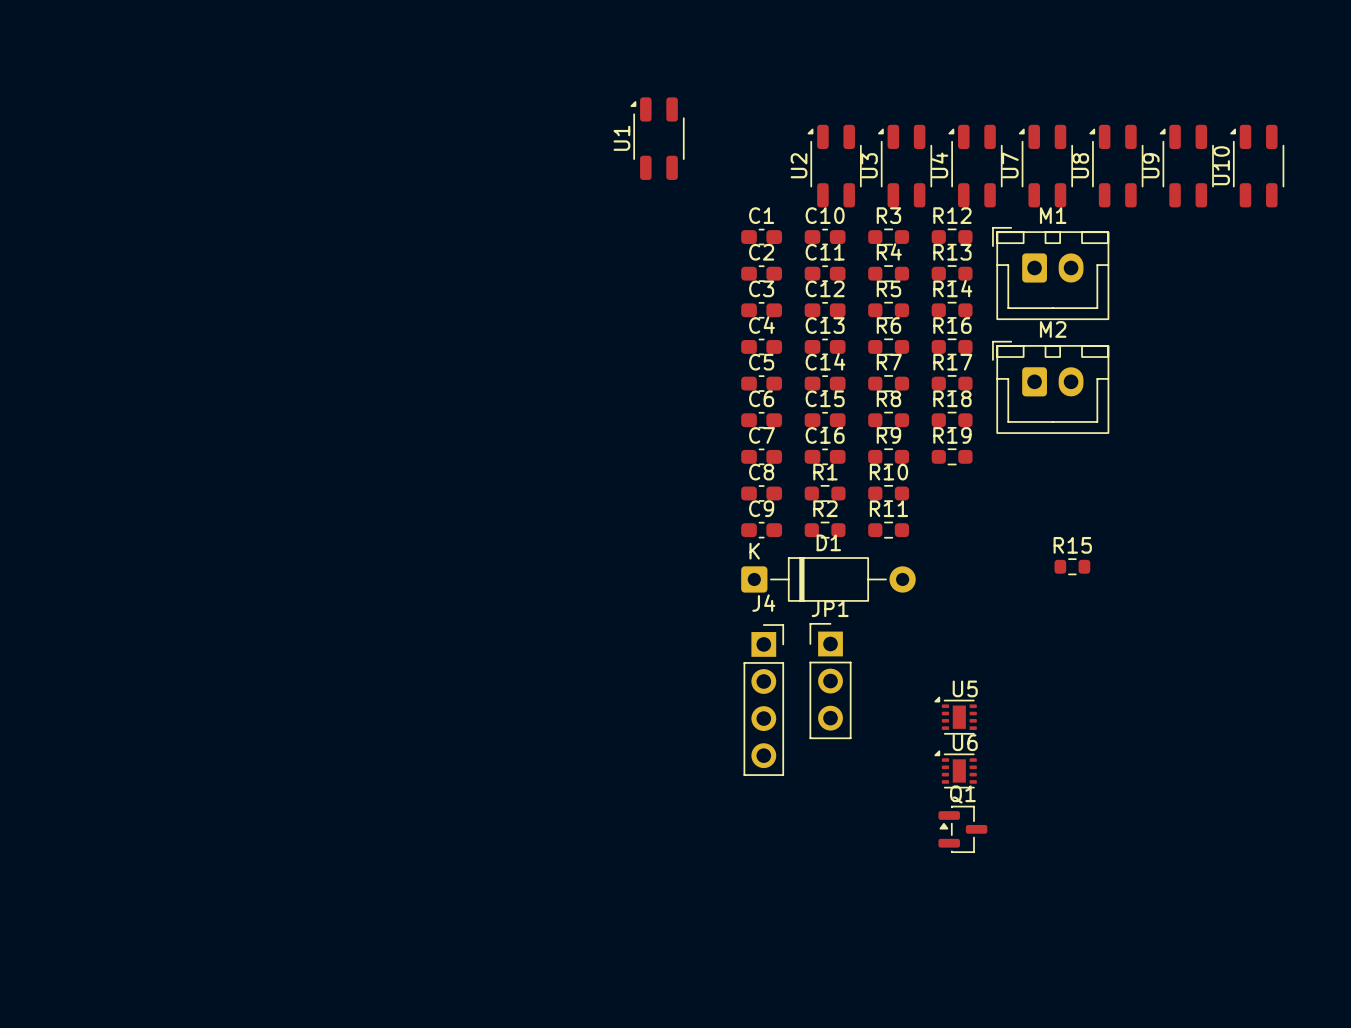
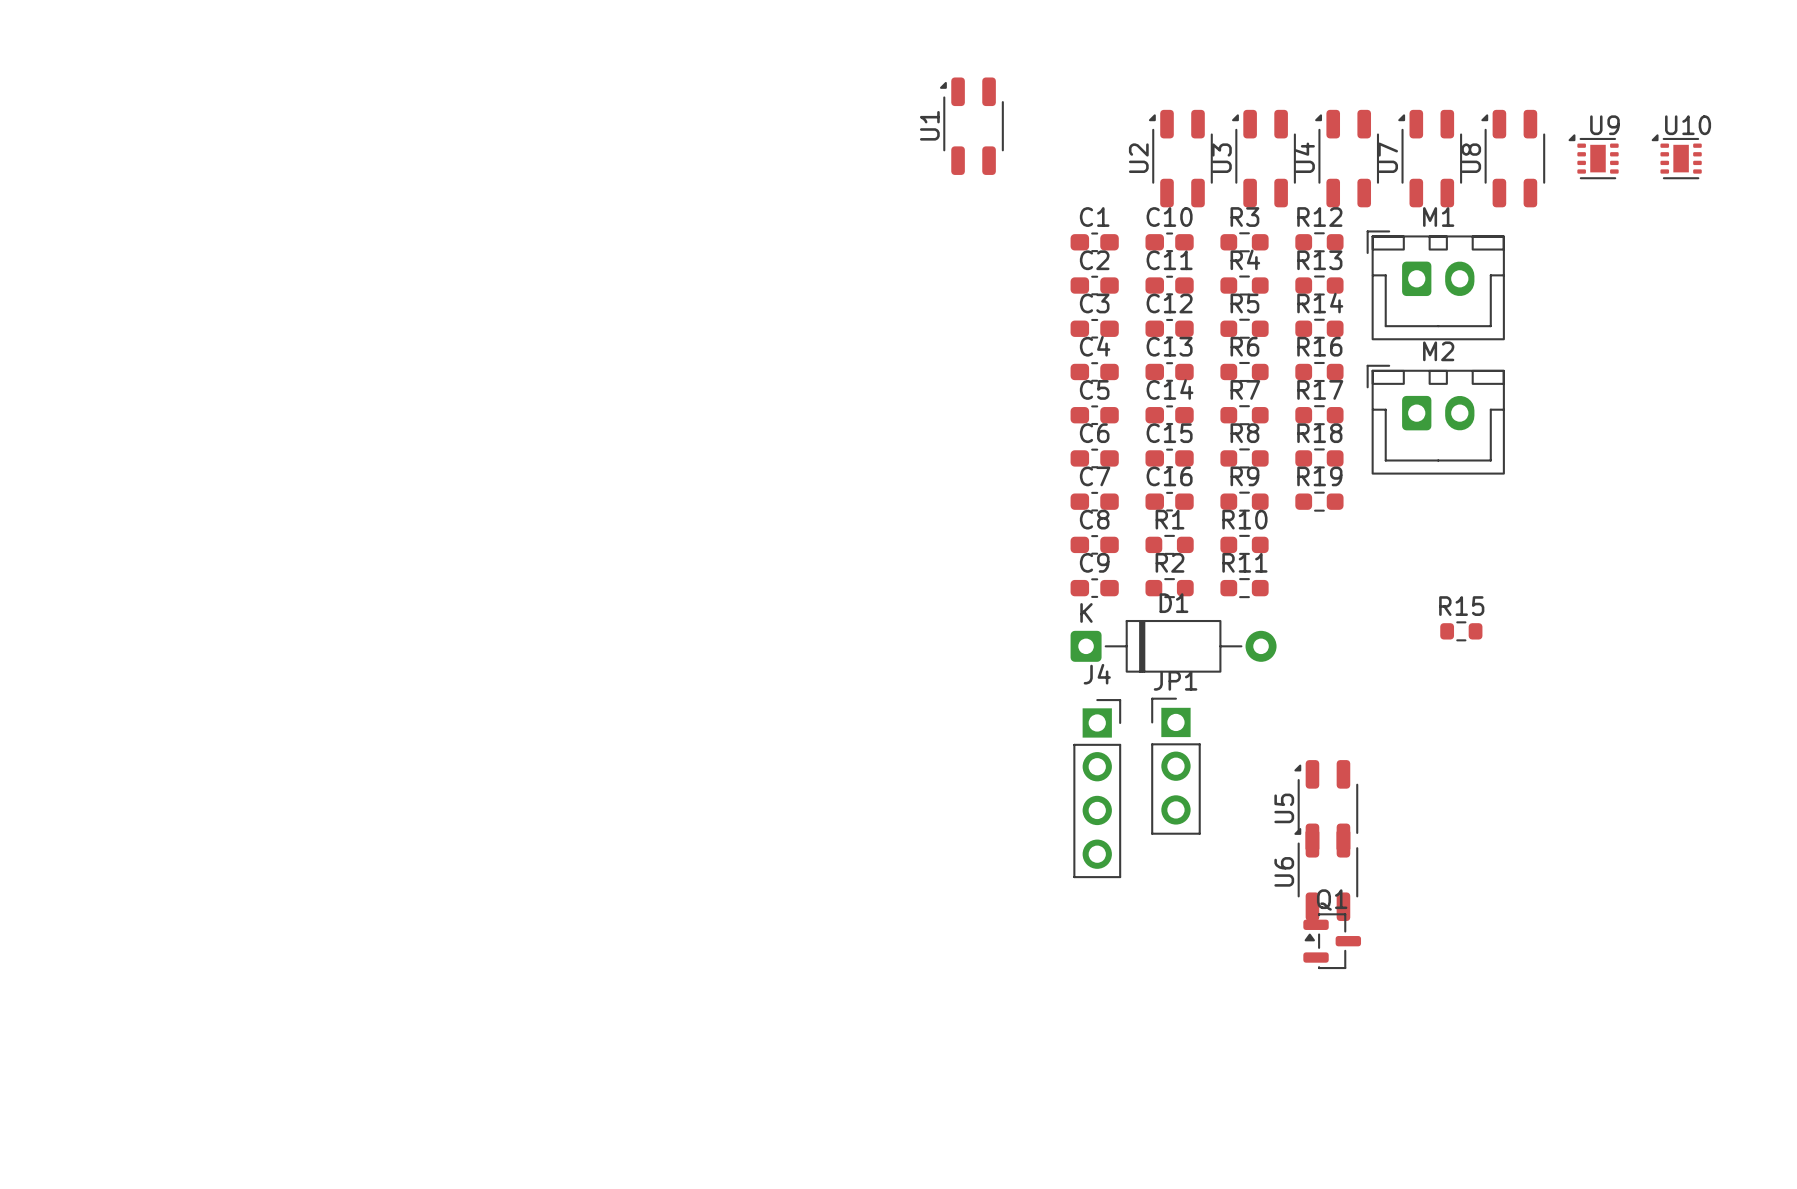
U9 footprint: [1159, 124, 1214, 208] -> [1568, 134, 1619, 180]
U10 footprint: [1230, 124, 1285, 208] -> [1651, 134, 1702, 180]
U9 name position: U9 (1151, 165) -> U9 (1604, 125)
U10 name position: U10 (1221, 165) -> U10 (1688, 125)
U5 name position: U5 (965, 688) -> U5 (1284, 808)
U5 footprint: [934, 696, 977, 735] -> [1294, 760, 1359, 858]
U6 name position: U6 (965, 742) -> U6 (1284, 871)
U6 footprint: [934, 750, 977, 789] -> [1294, 823, 1359, 922]

